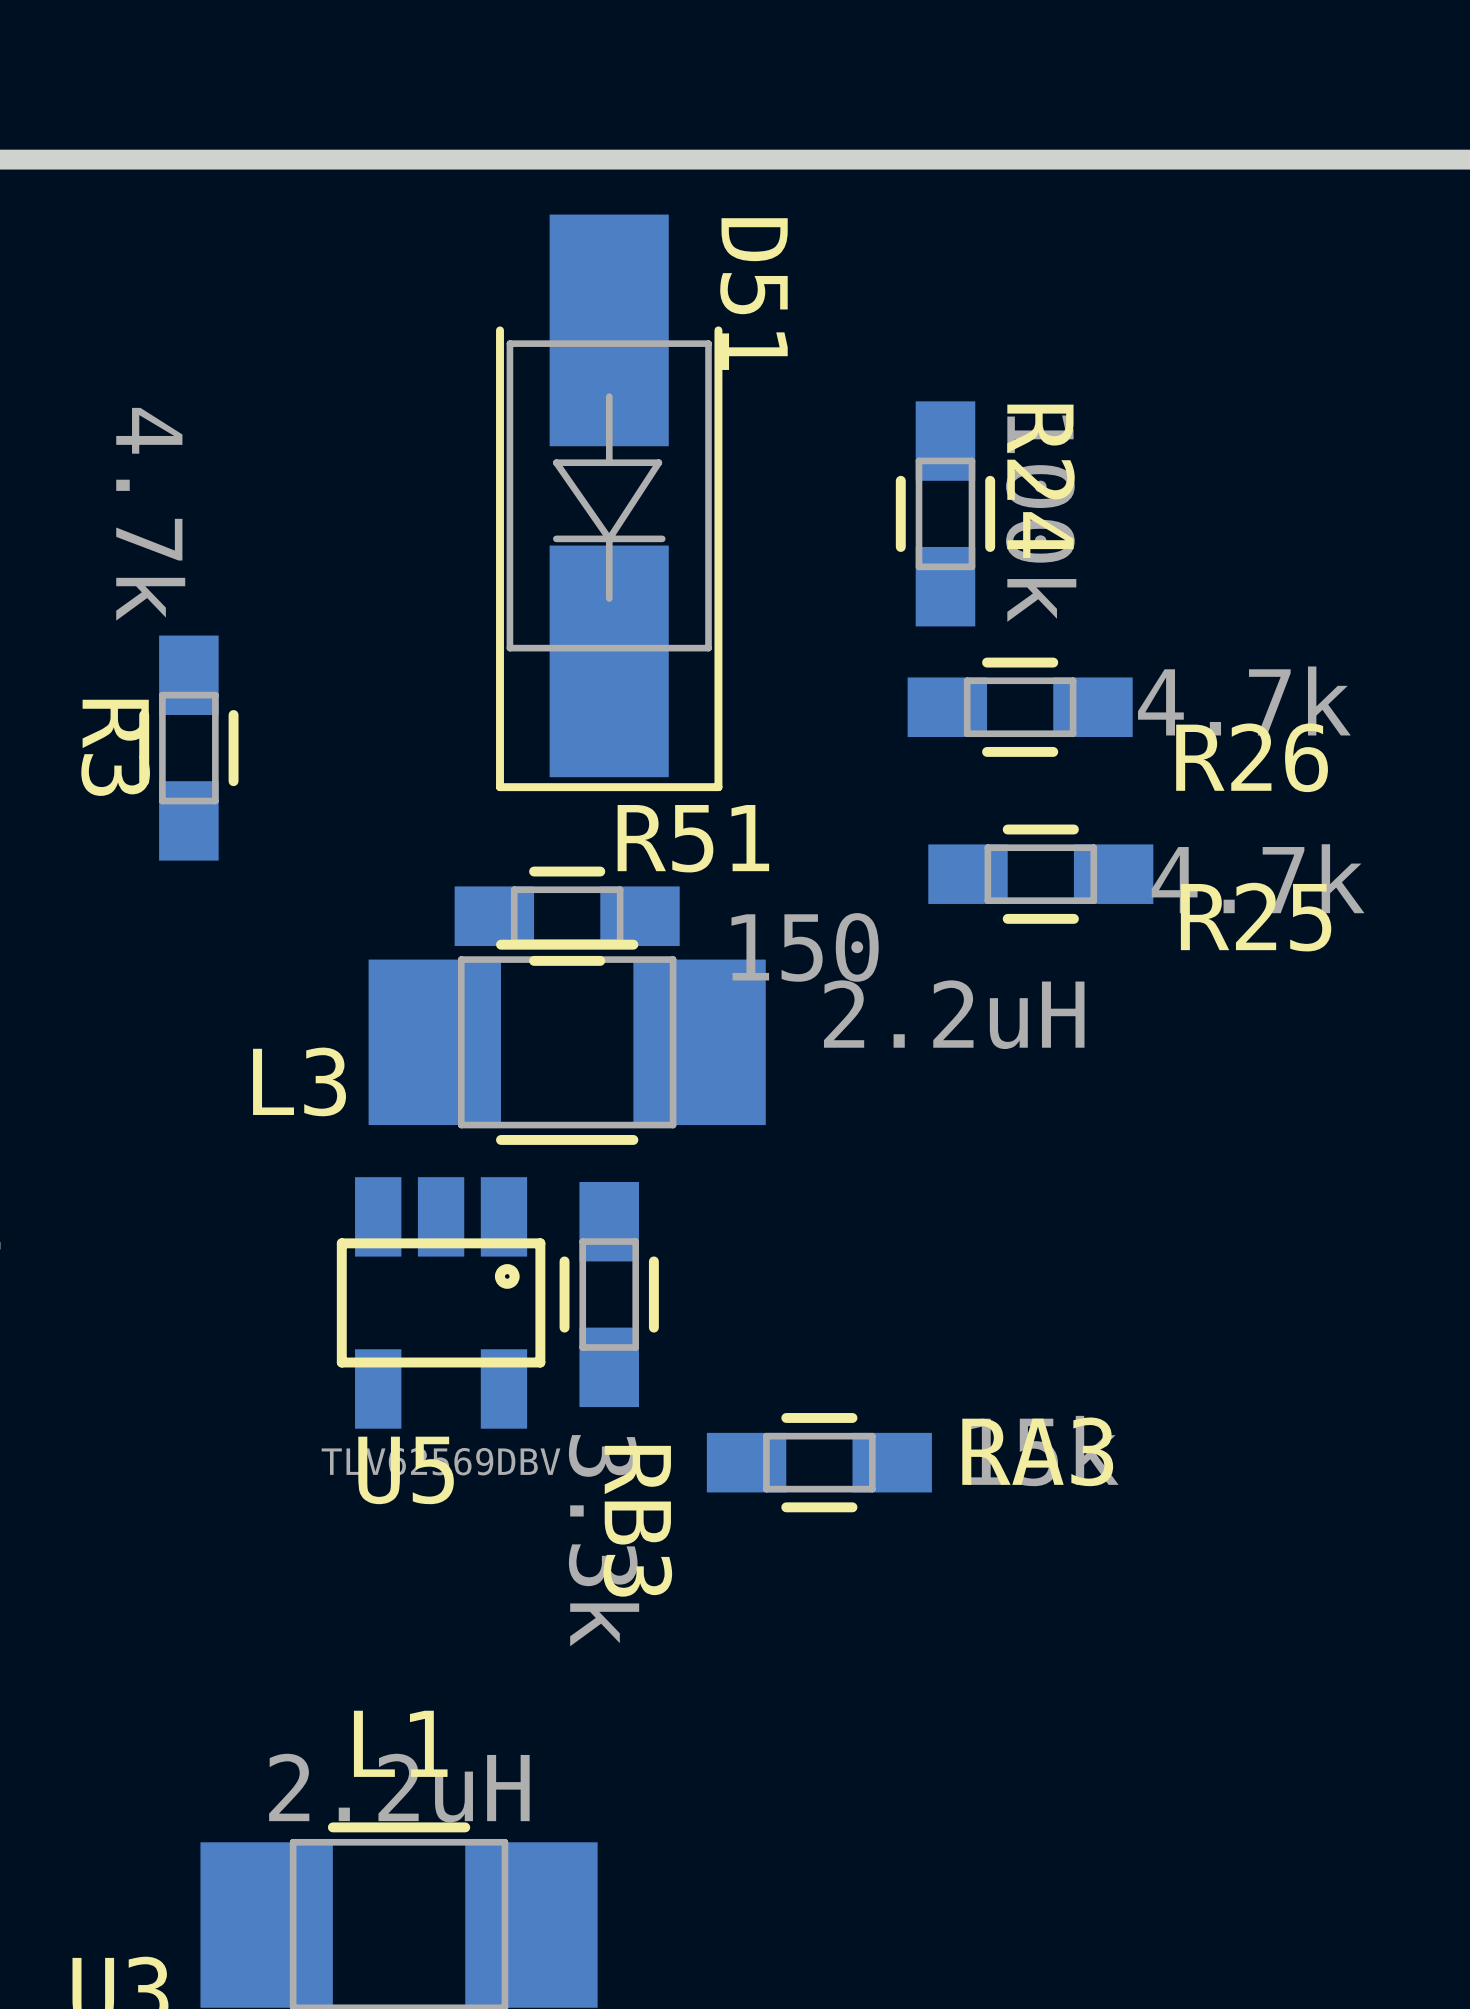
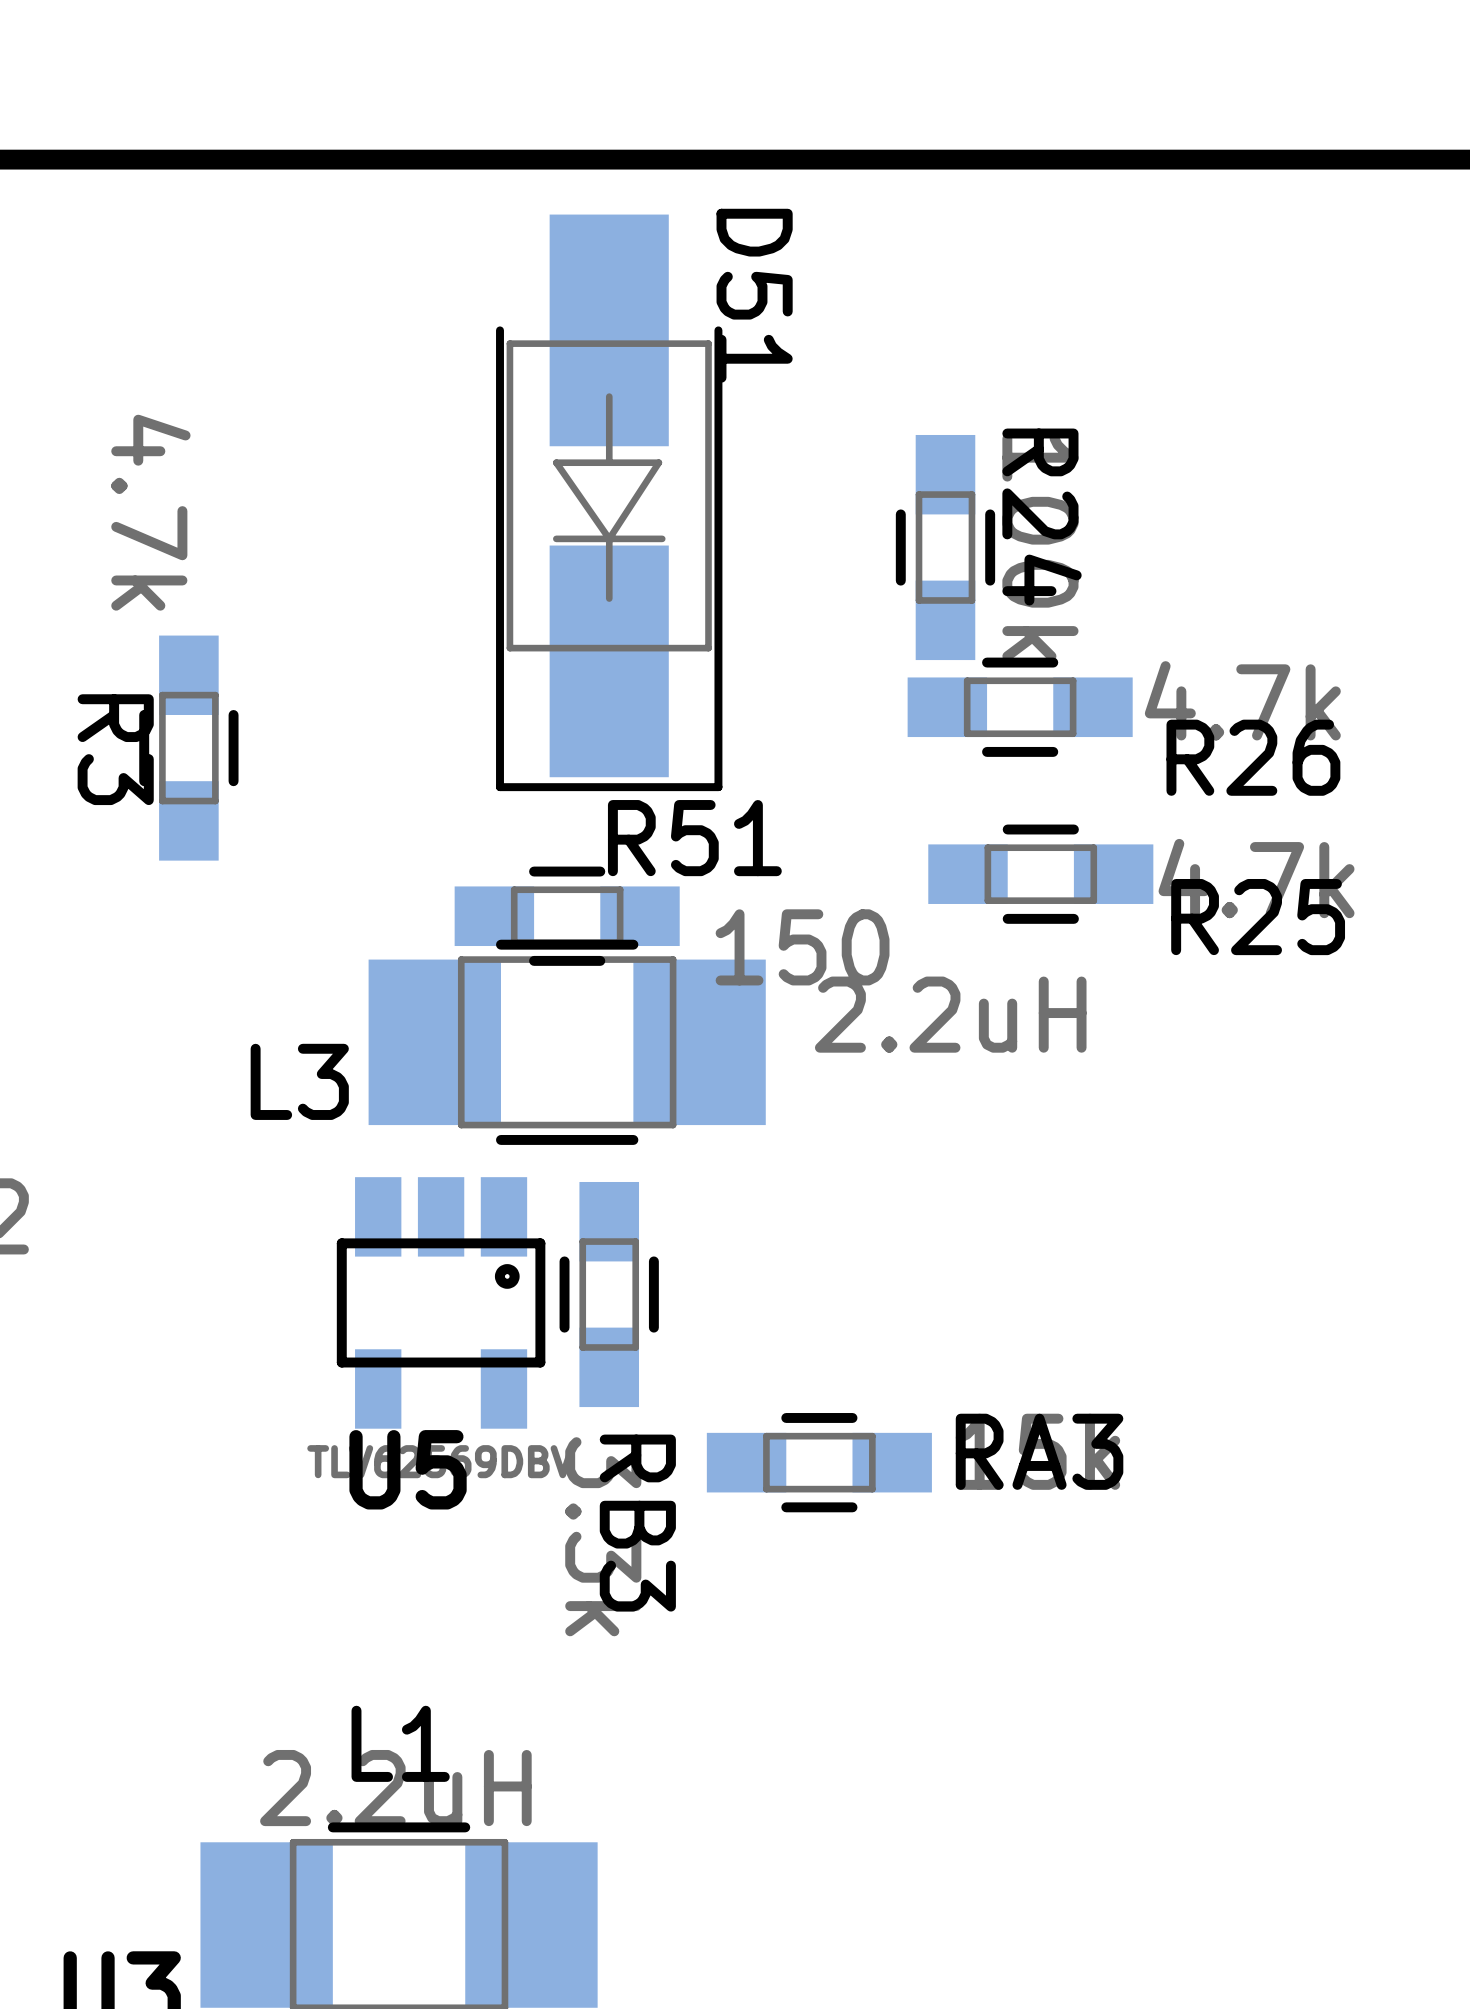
R24 position: (945, 513) -> (945, 547)

